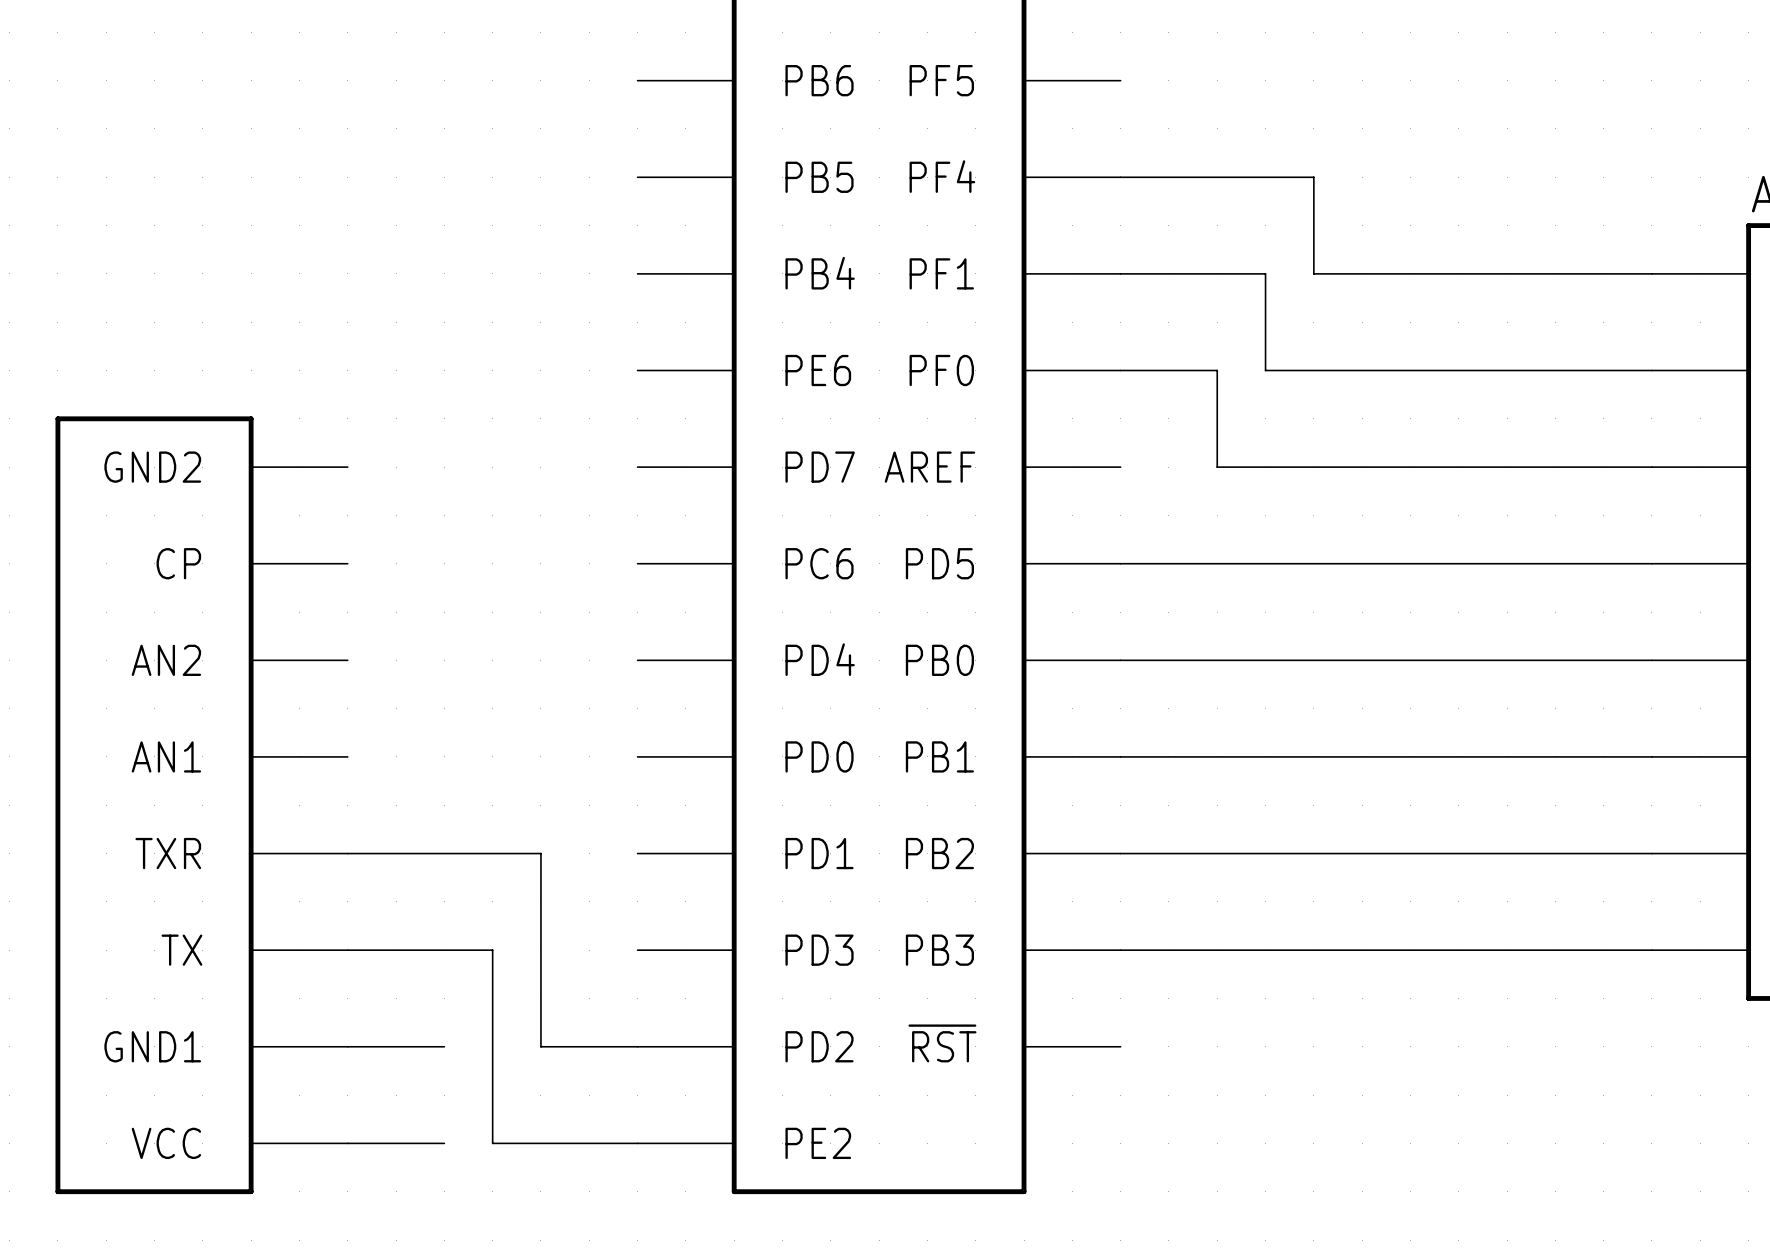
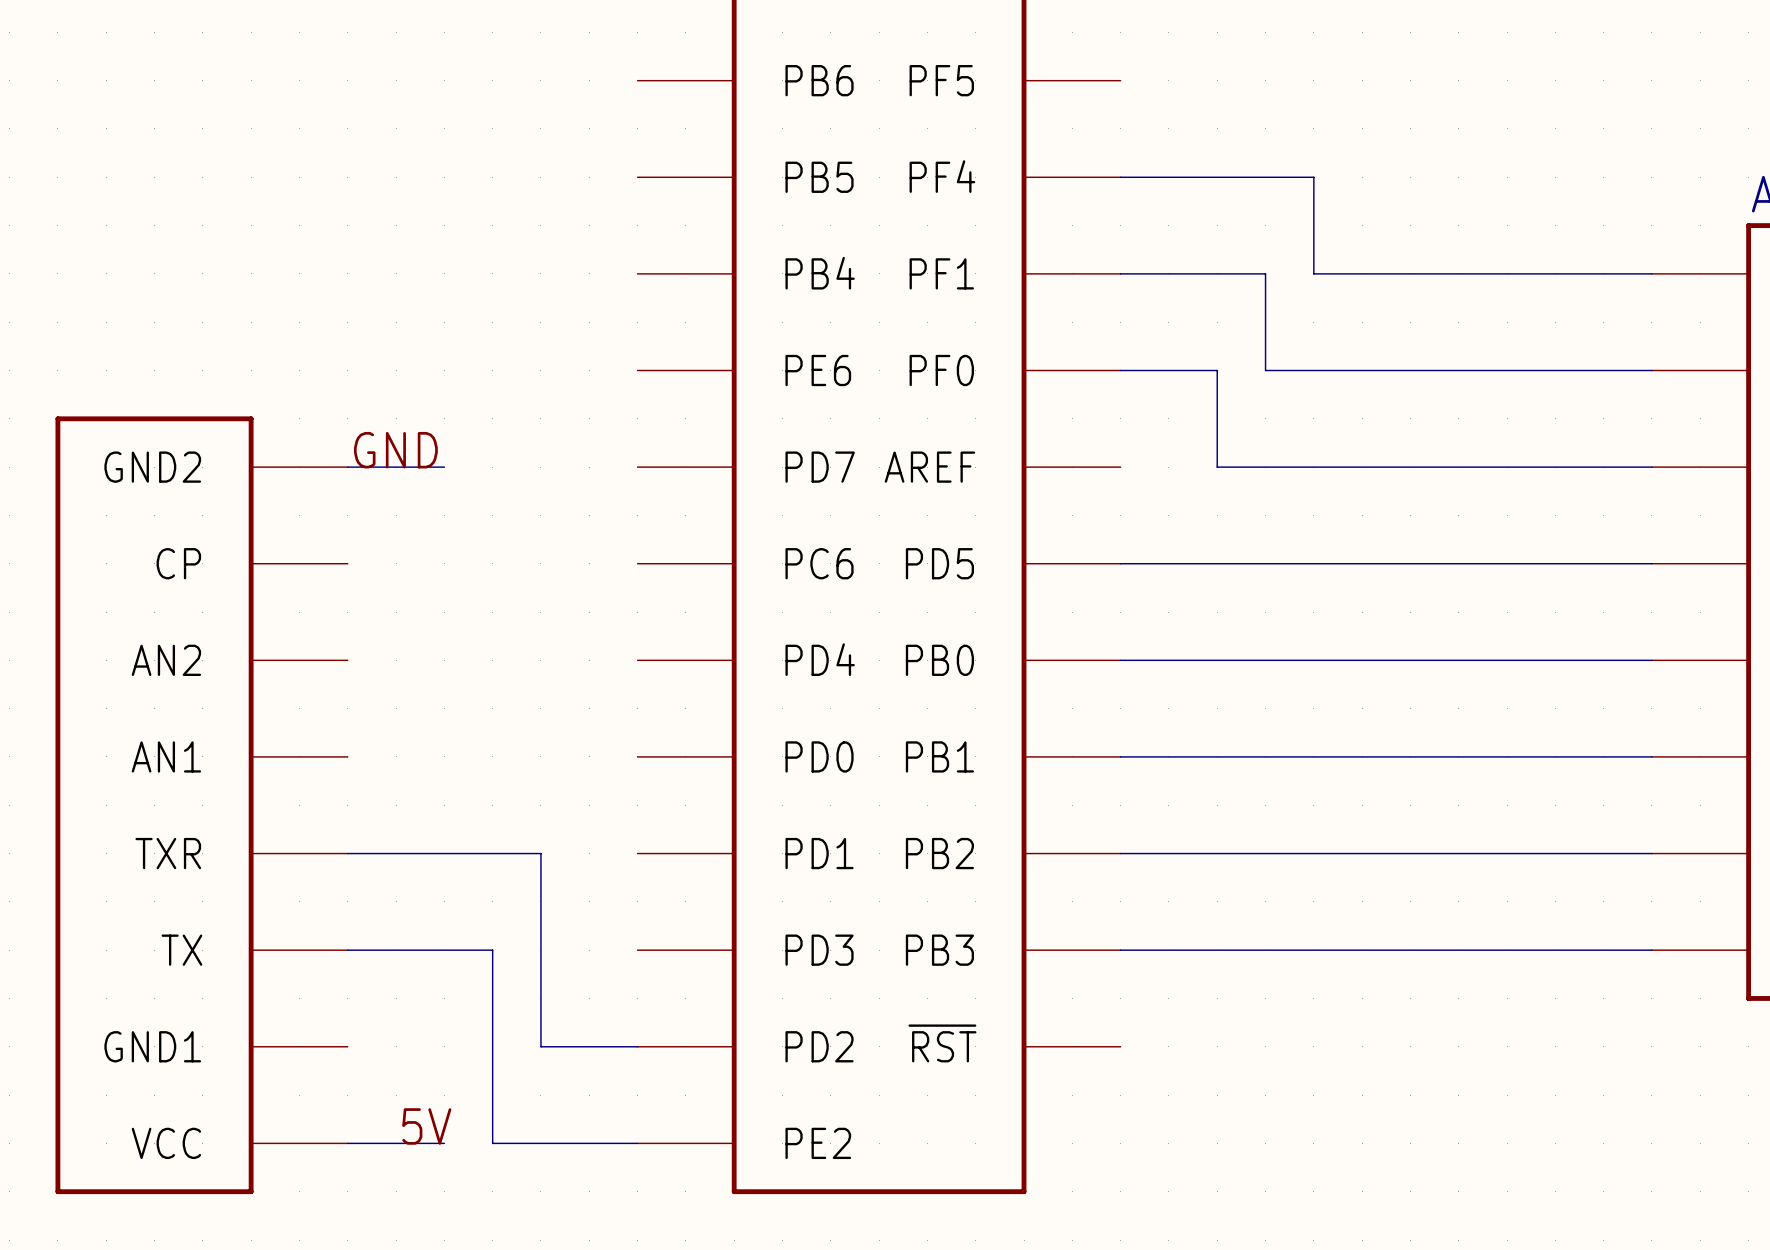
label: none -> GND (395, 450)
wire: none -> (347, 467) (444, 467)
wire: (347, 1046) (444, 1046) -> none
label: none -> 5V (426, 1126)

